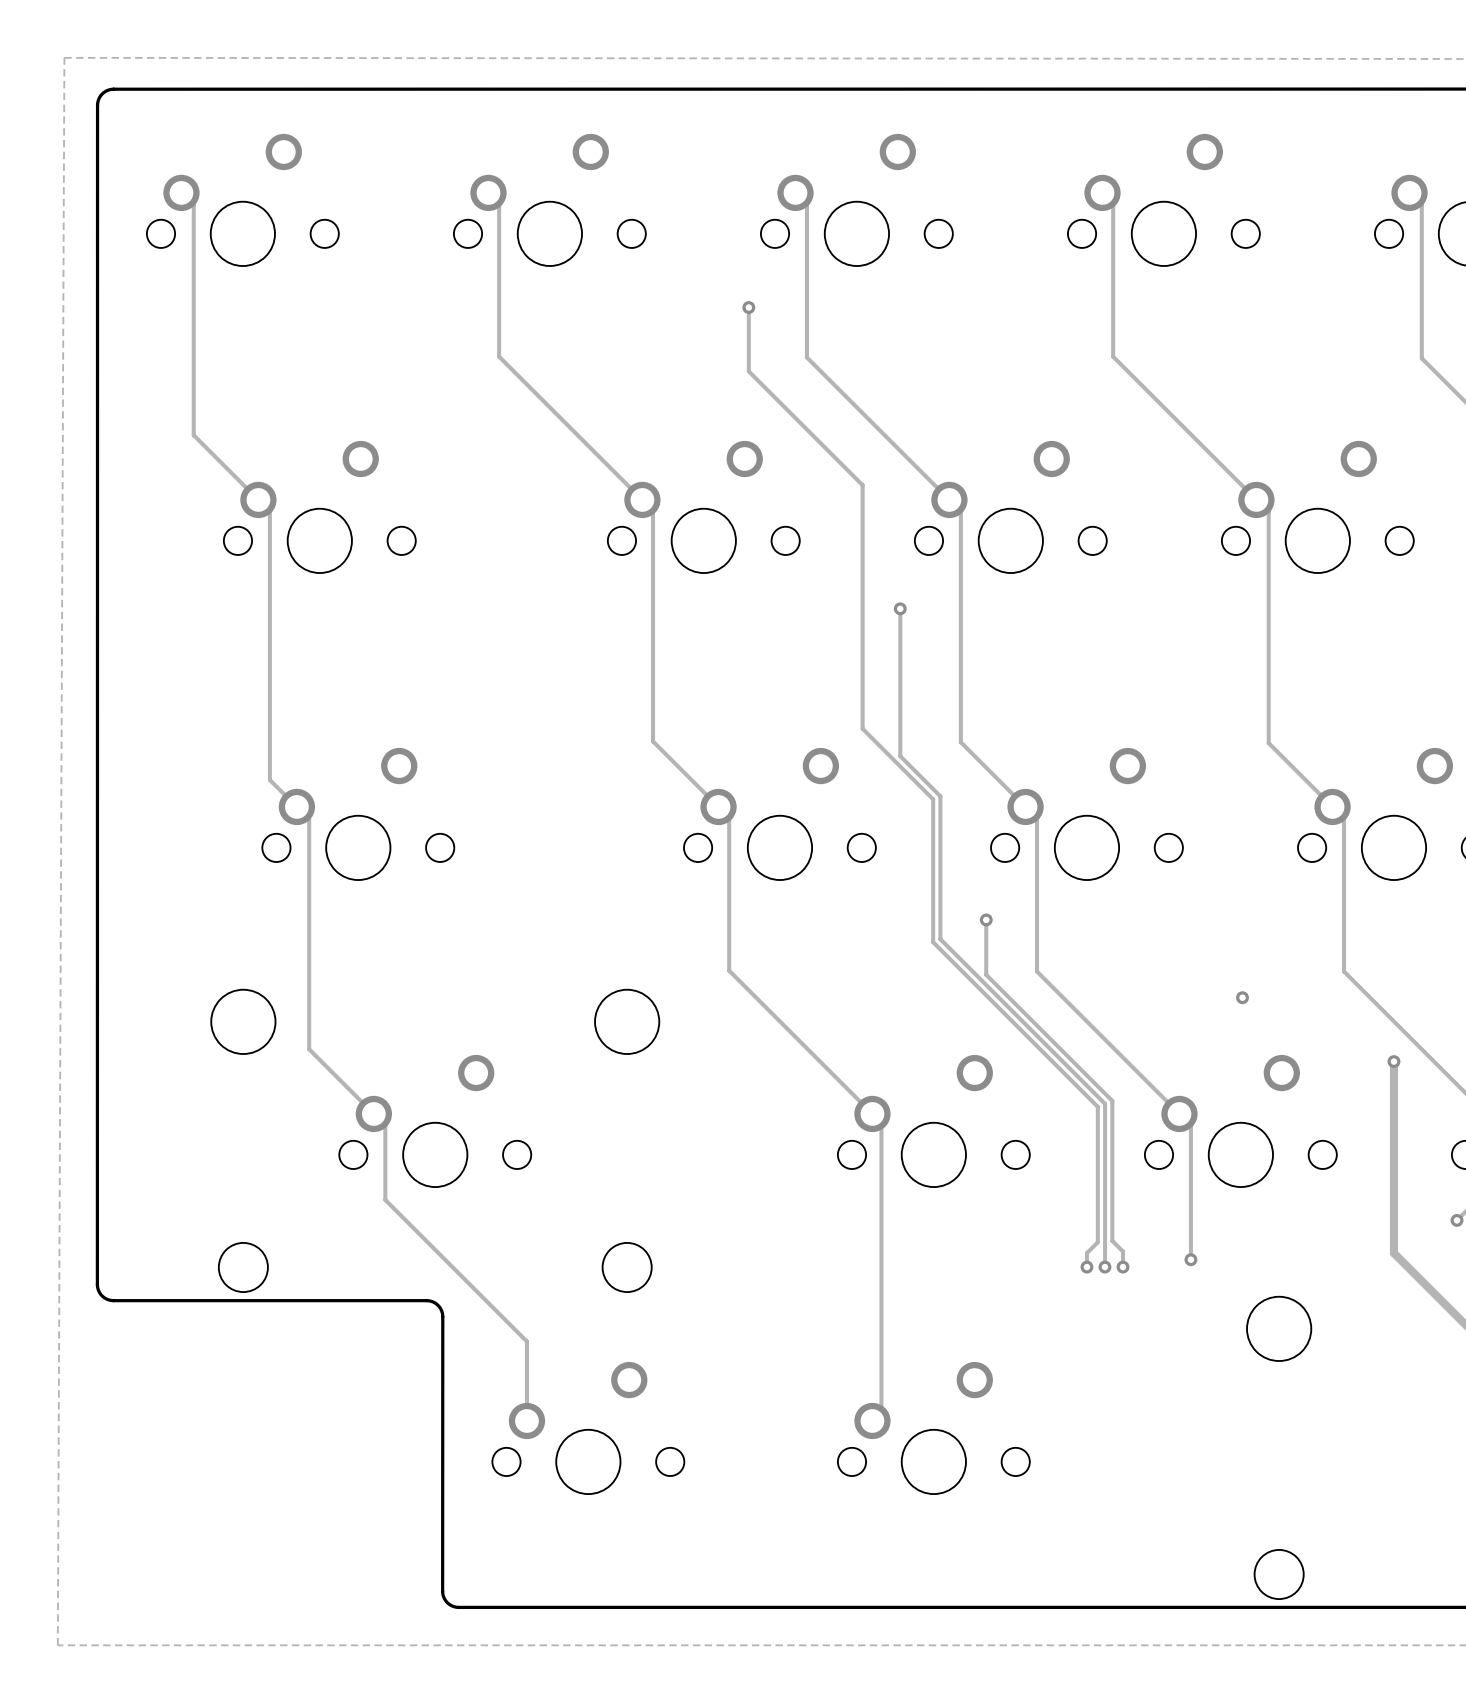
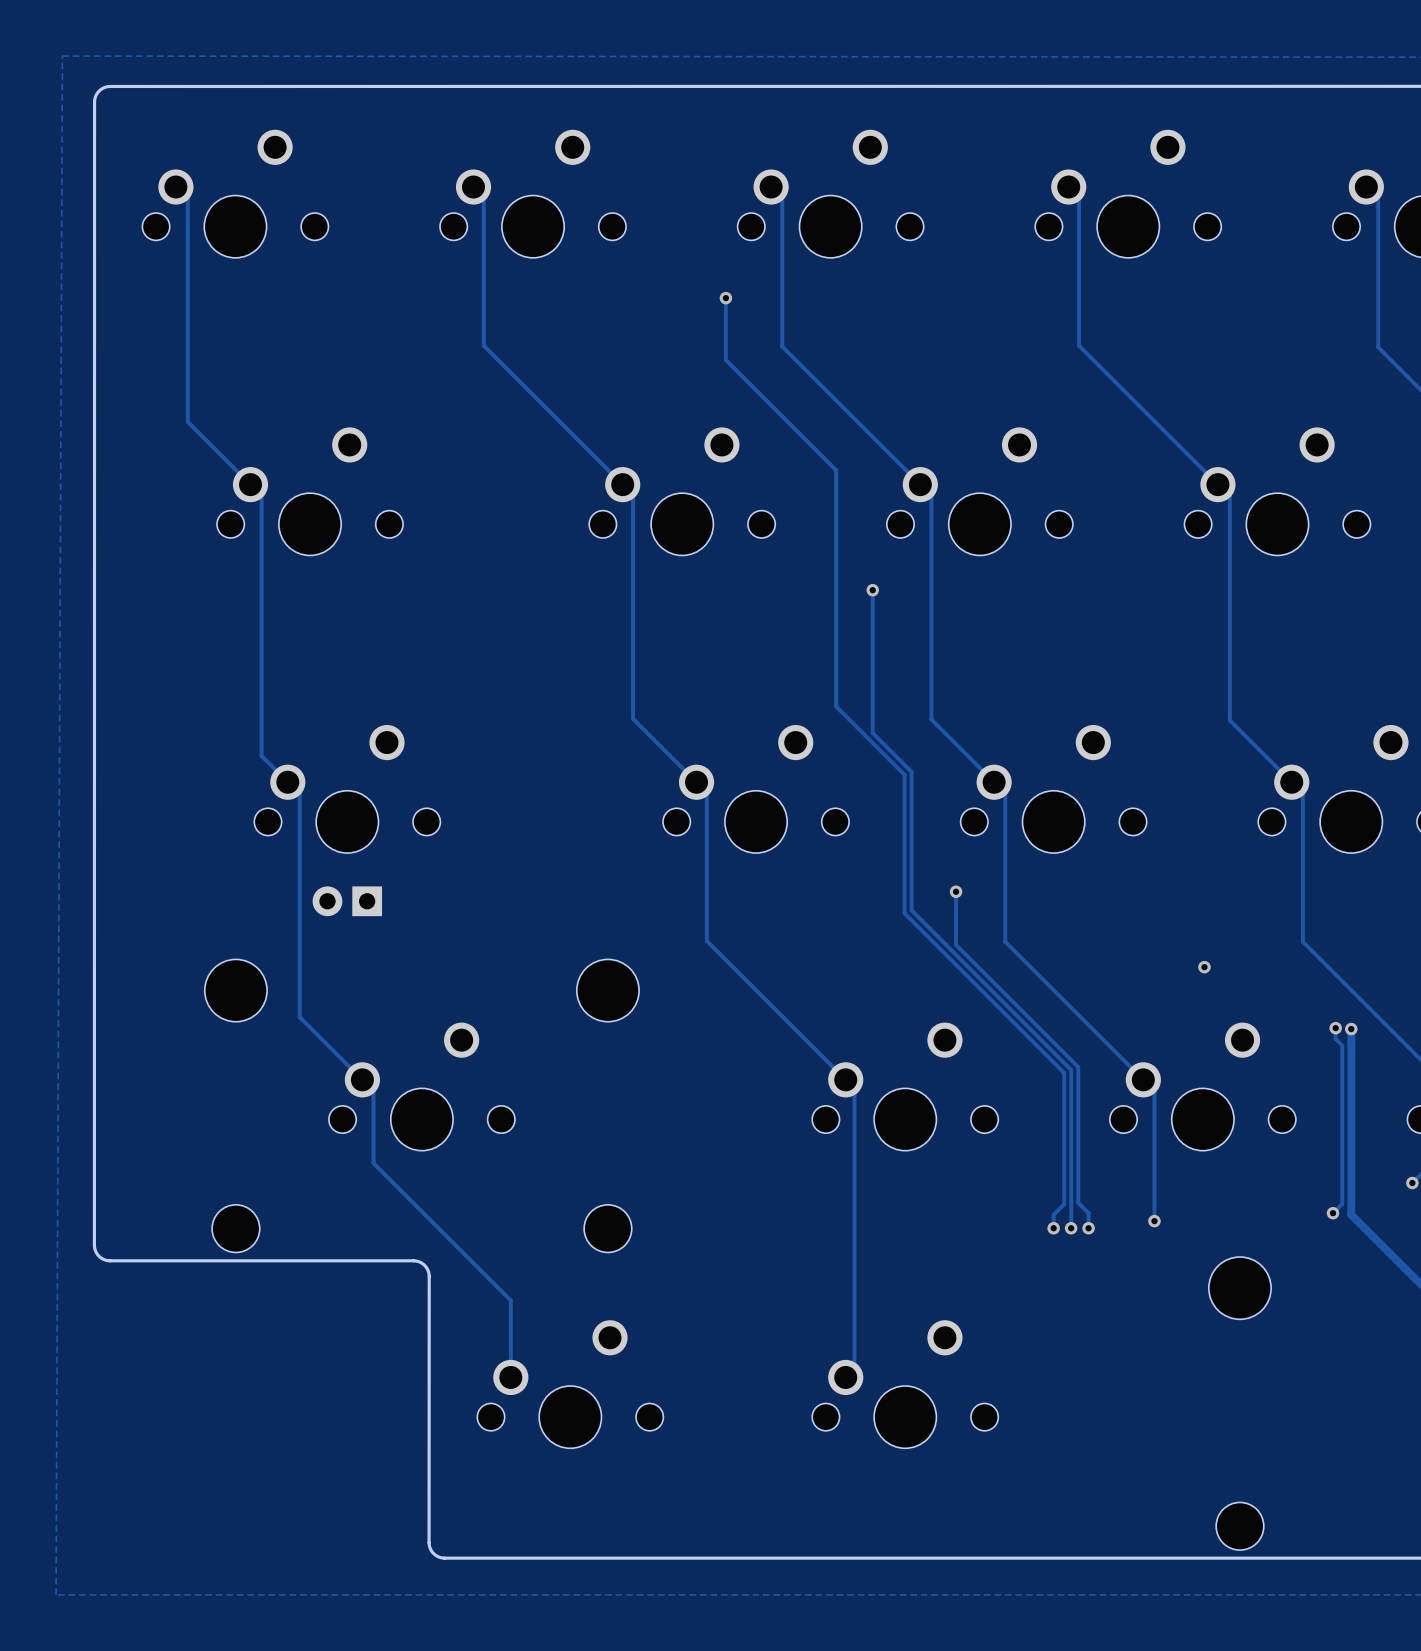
part: none -> (347, 820)
track: none -> (1335, 1028) (1335, 1039) (1342, 1045) (1342, 1203) (1333, 1213)
via: none -> (1335, 1028)
via: none -> (1333, 1213)

